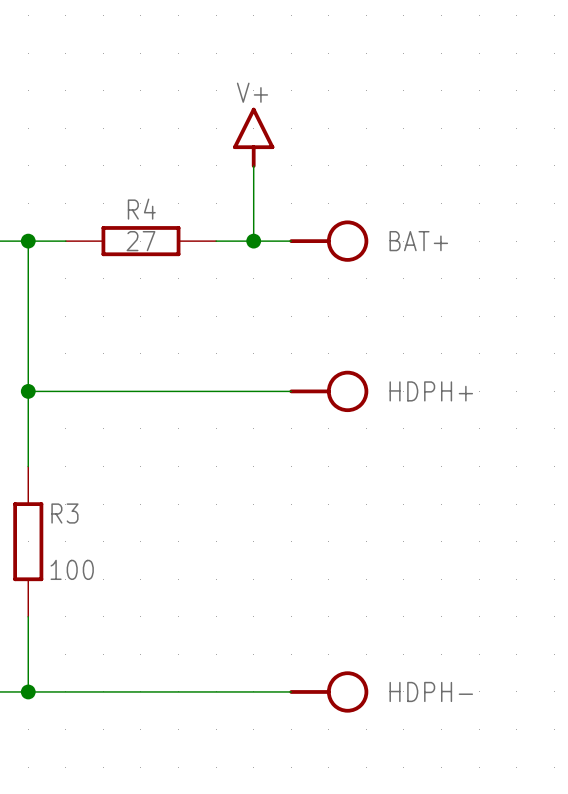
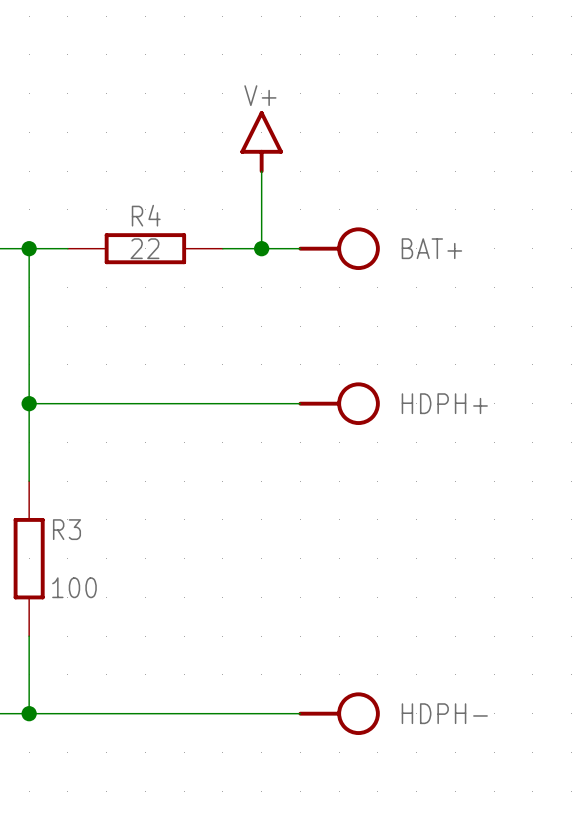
R4 value: 27 (140, 241) -> 22 (144, 248)

